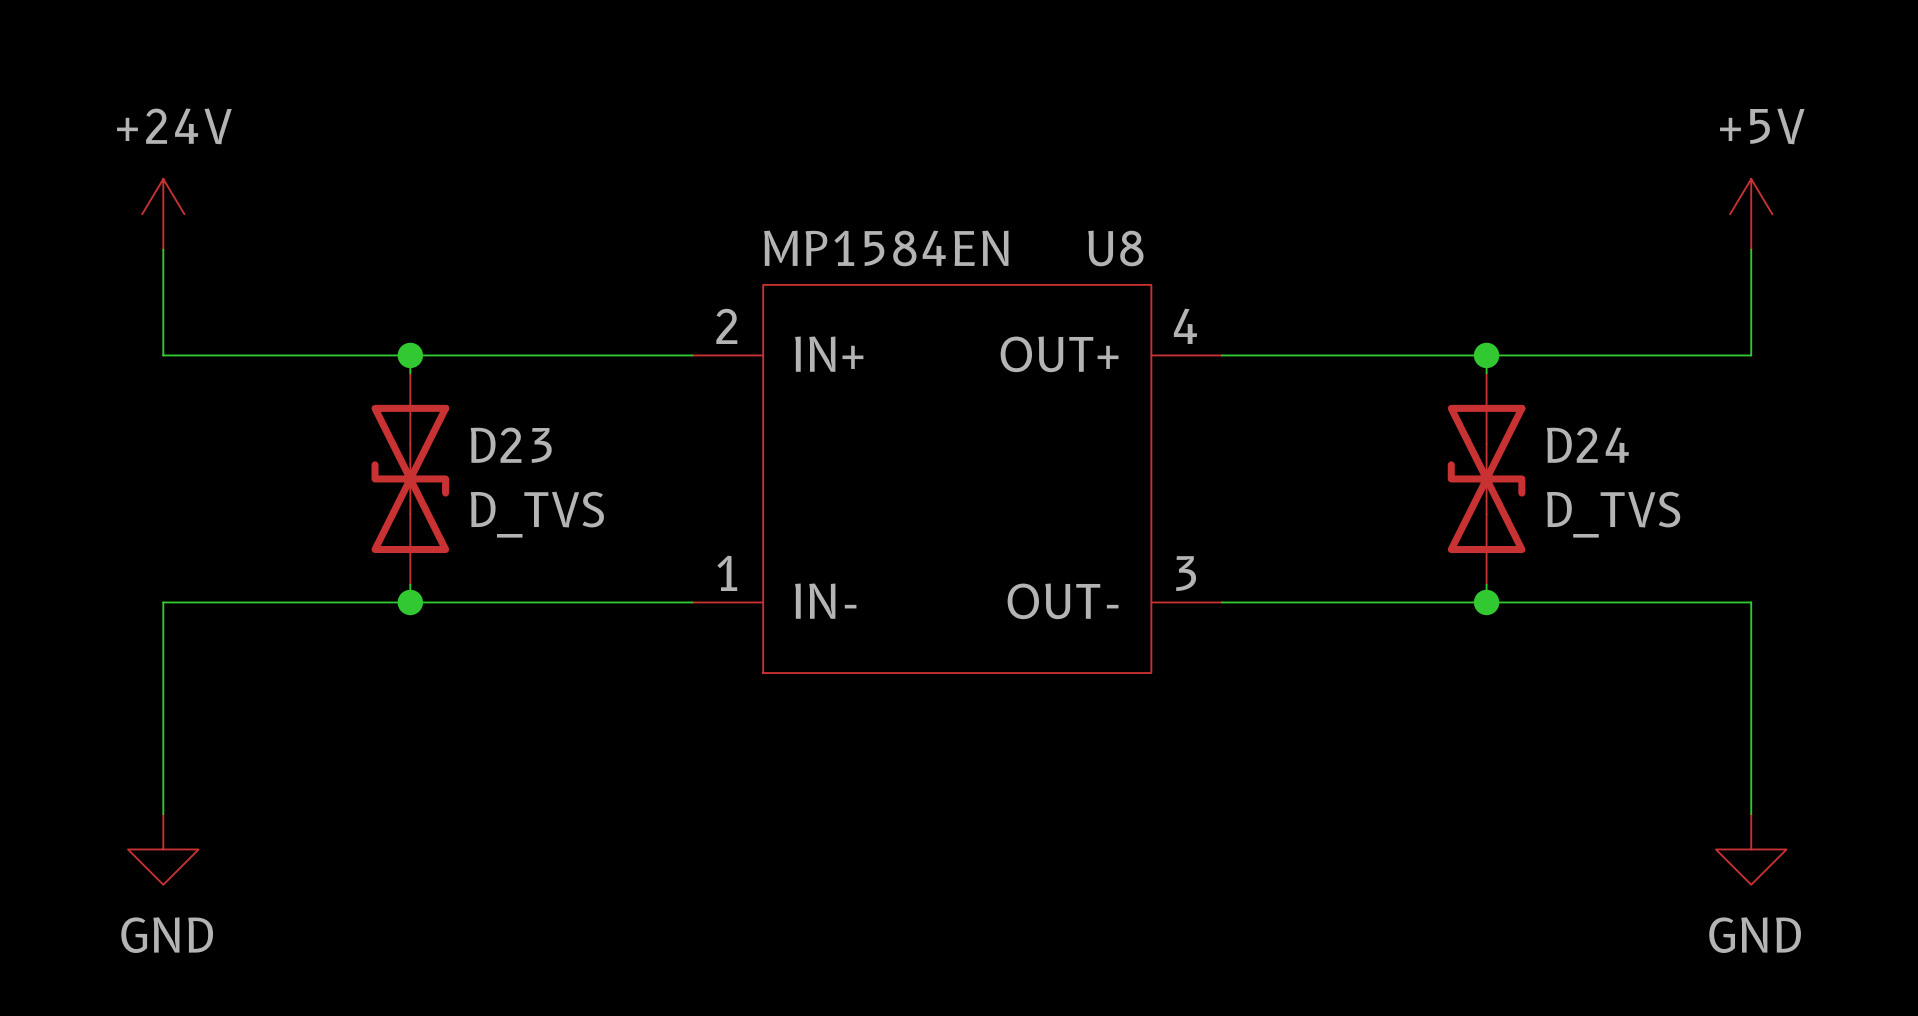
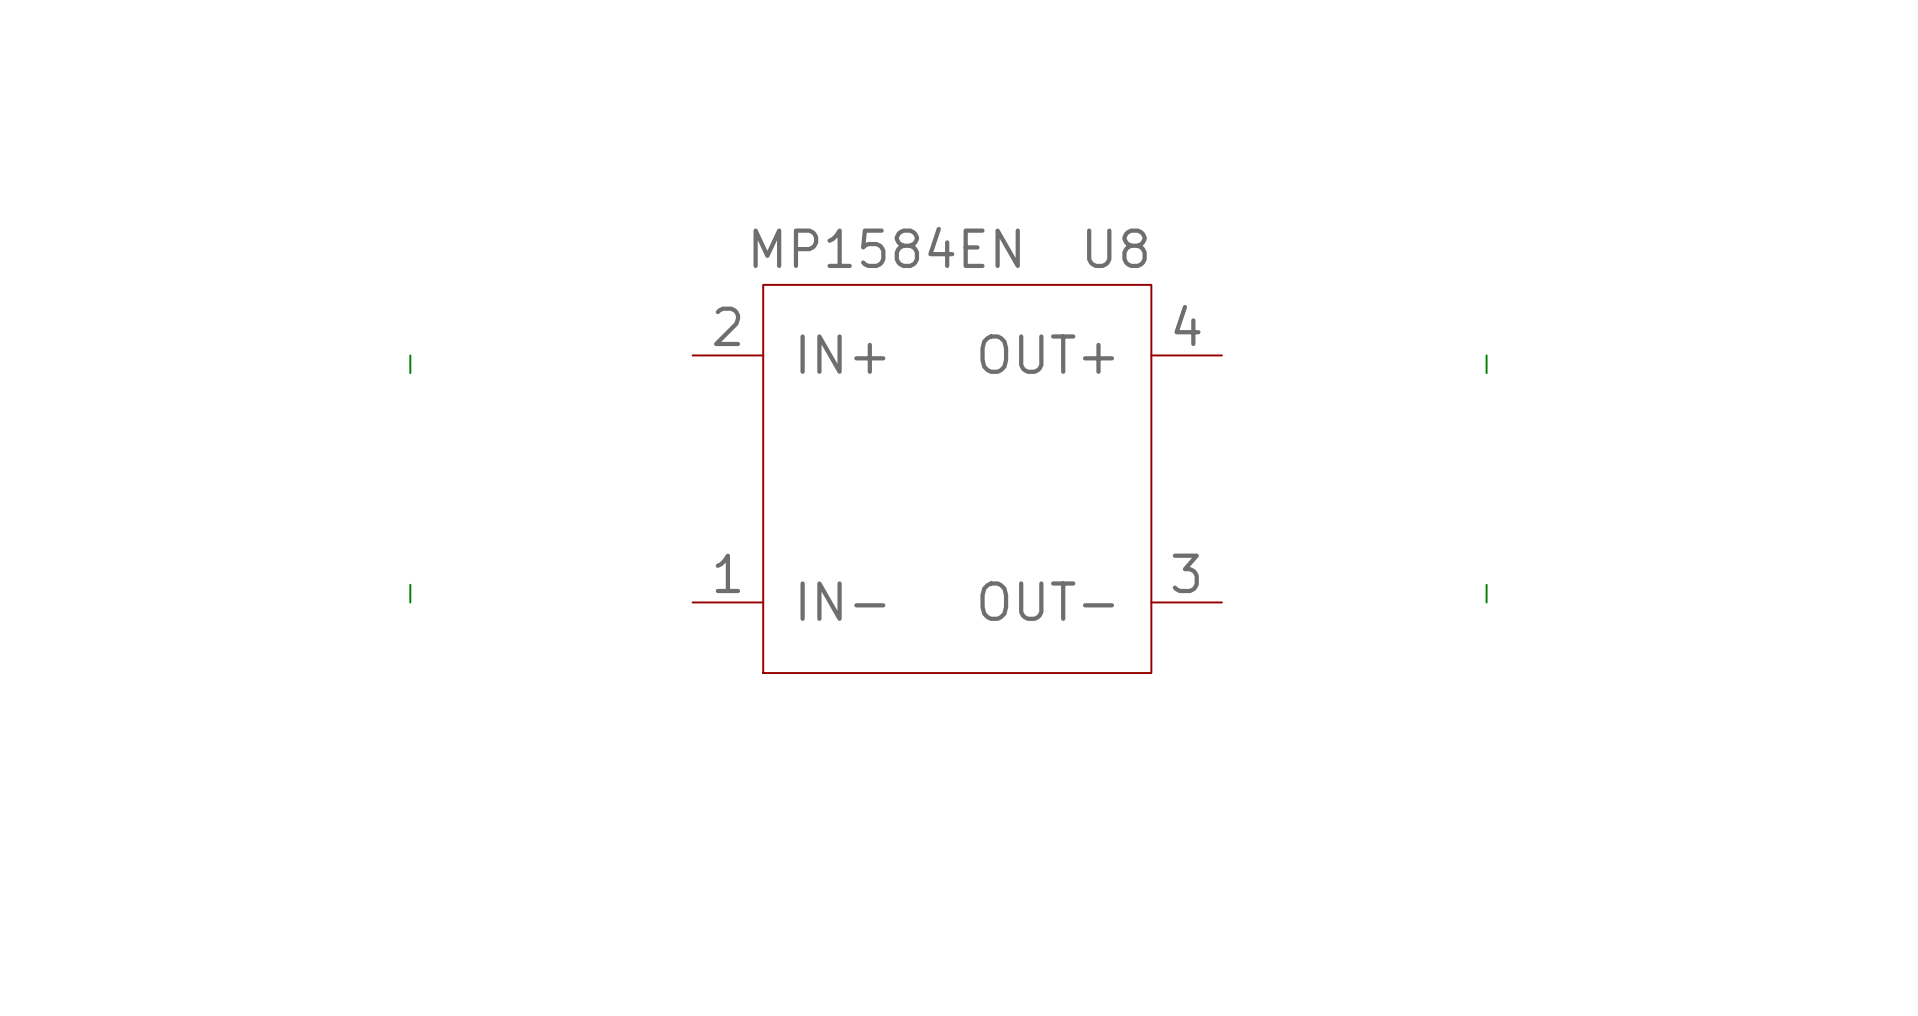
power symbol: +24V (163, 214) -> none
power symbol: +5V (1751, 214) -> none
wire: (163, 249) (163, 355) (692, 355) -> none
wire: (1751, 249) (1751, 355) (1221, 355) -> none
junction: (410, 355) -> none
junction: (1486, 355) -> none
D23: D_TVS (410, 478) -> none
D24: D_TVS (1486, 478) -> none
junction: (410, 602) -> none
wire: (692, 602) (163, 602) (163, 814) -> none
wire: (1221, 602) (1751, 602) (1751, 814) -> none
junction: (1486, 602) -> none
power symbol: GND (163, 849) -> none
power symbol: GND (1751, 849) -> none

